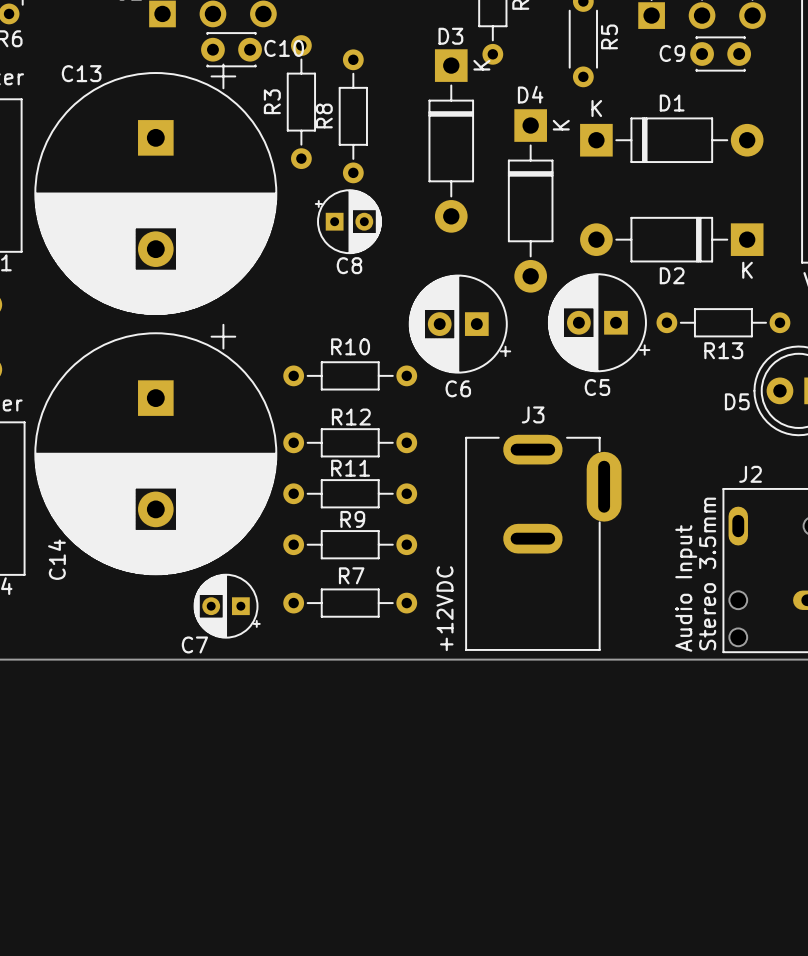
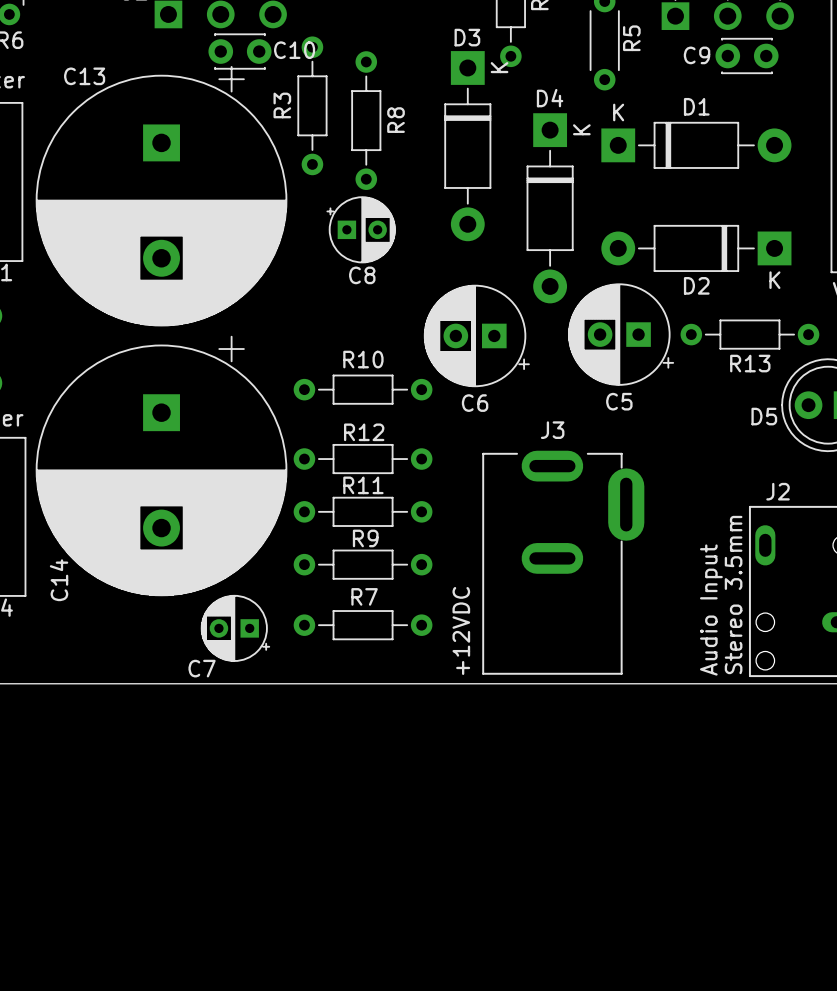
R8 name position: R8 (324, 115) -> R8 (396, 120)

